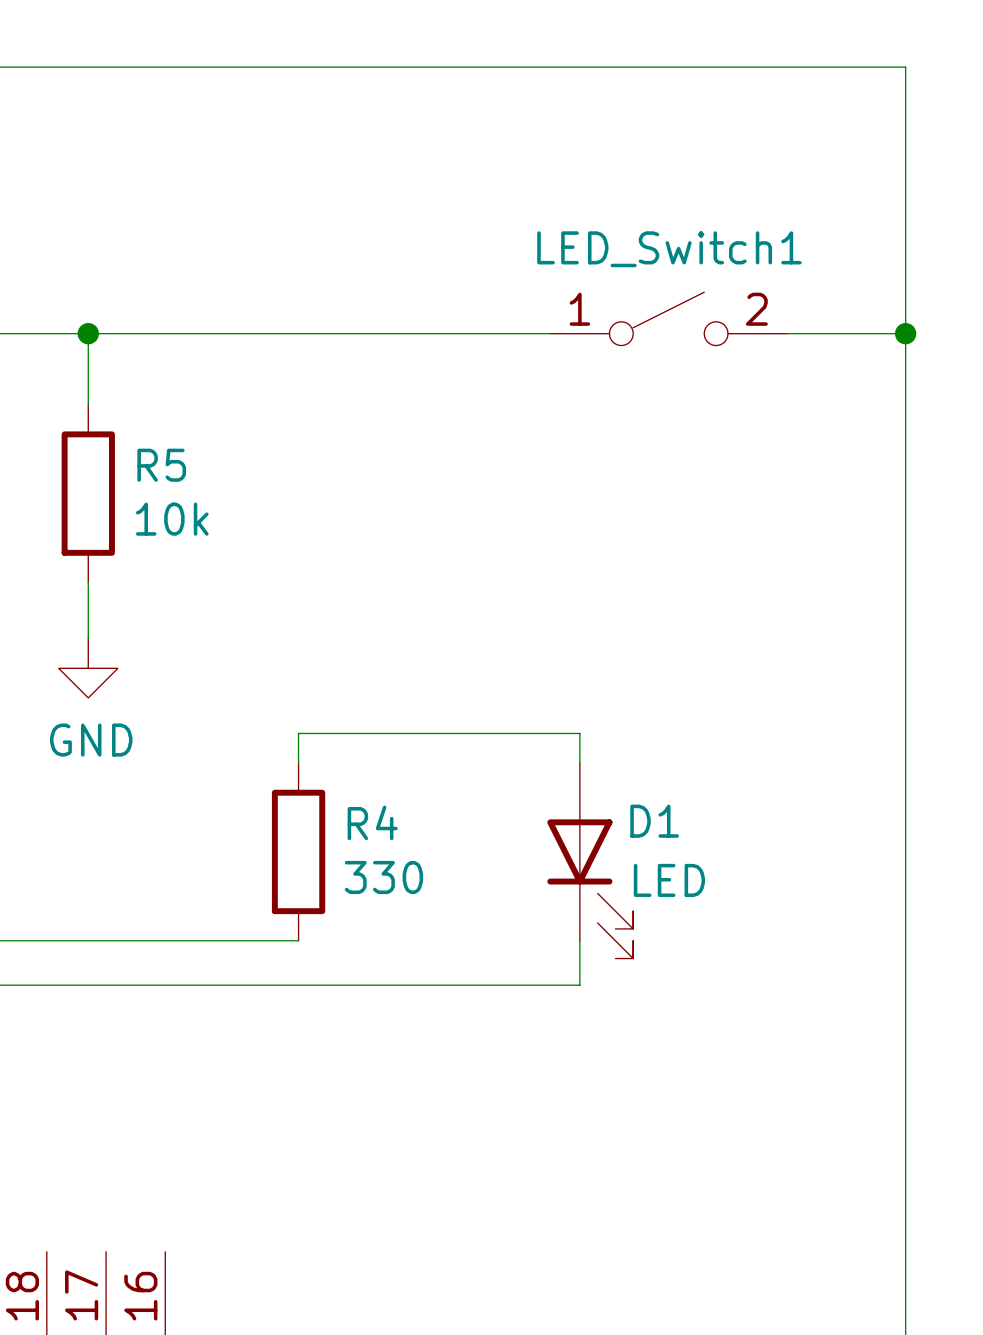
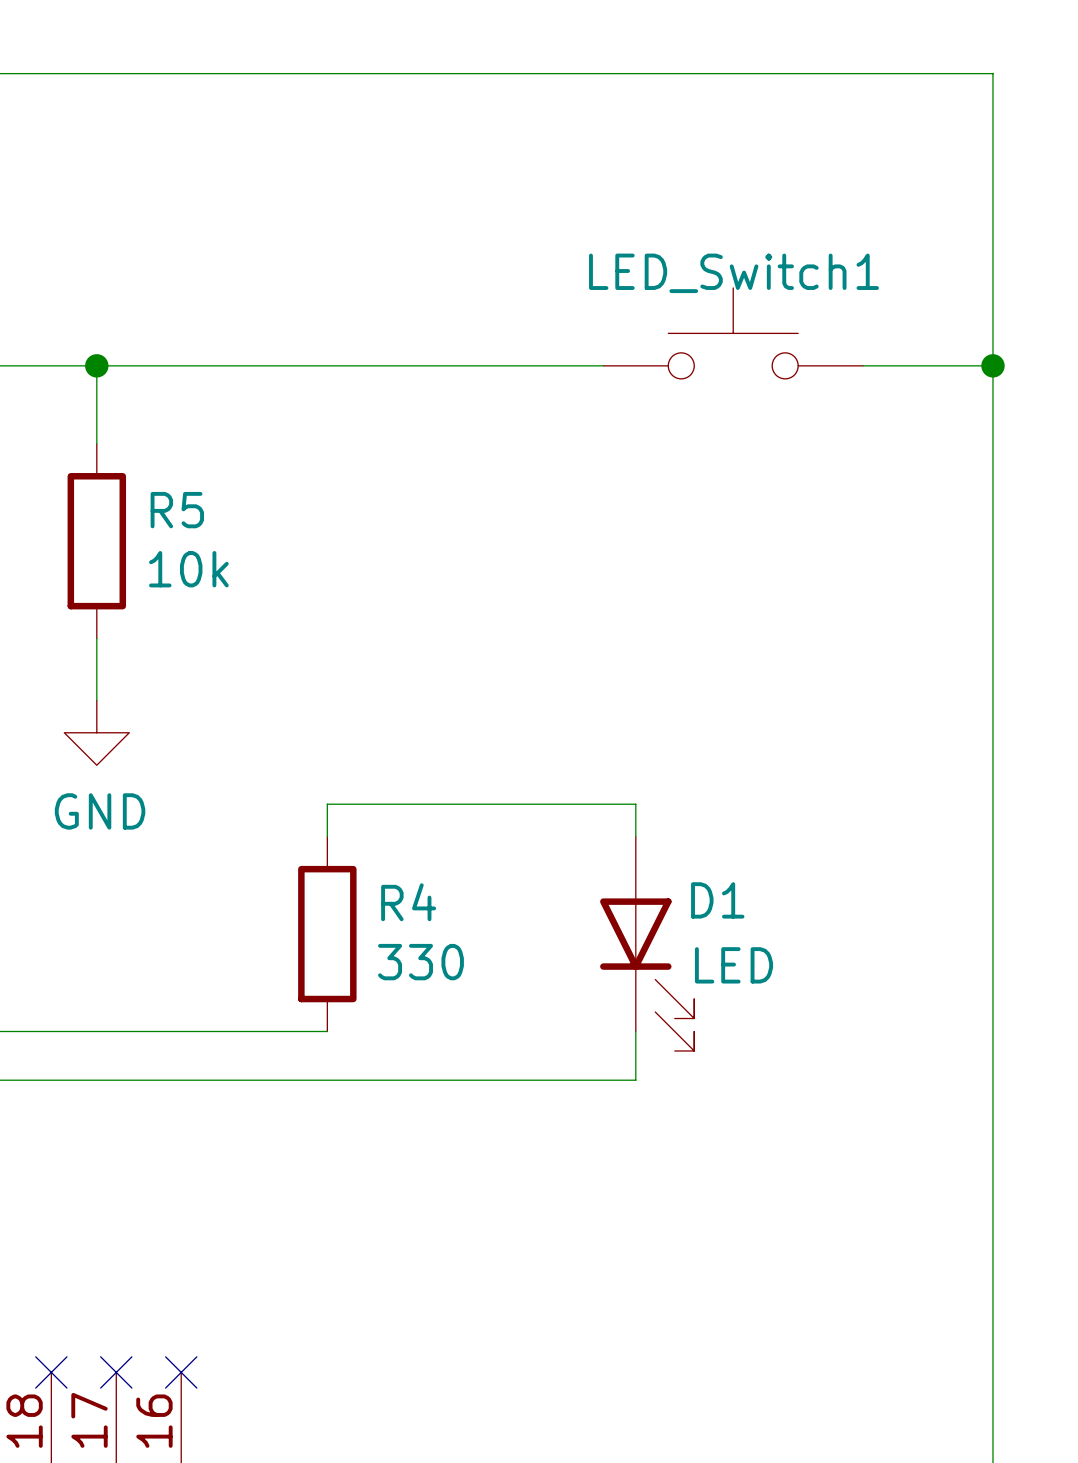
LED_Switch1 symbol: [550, 292, 788, 346] -> [603, 287, 864, 379]
no-connect mark: none -> (51, 1372)
no-connect mark: none -> (116, 1372)
no-connect mark: none -> (181, 1372)

